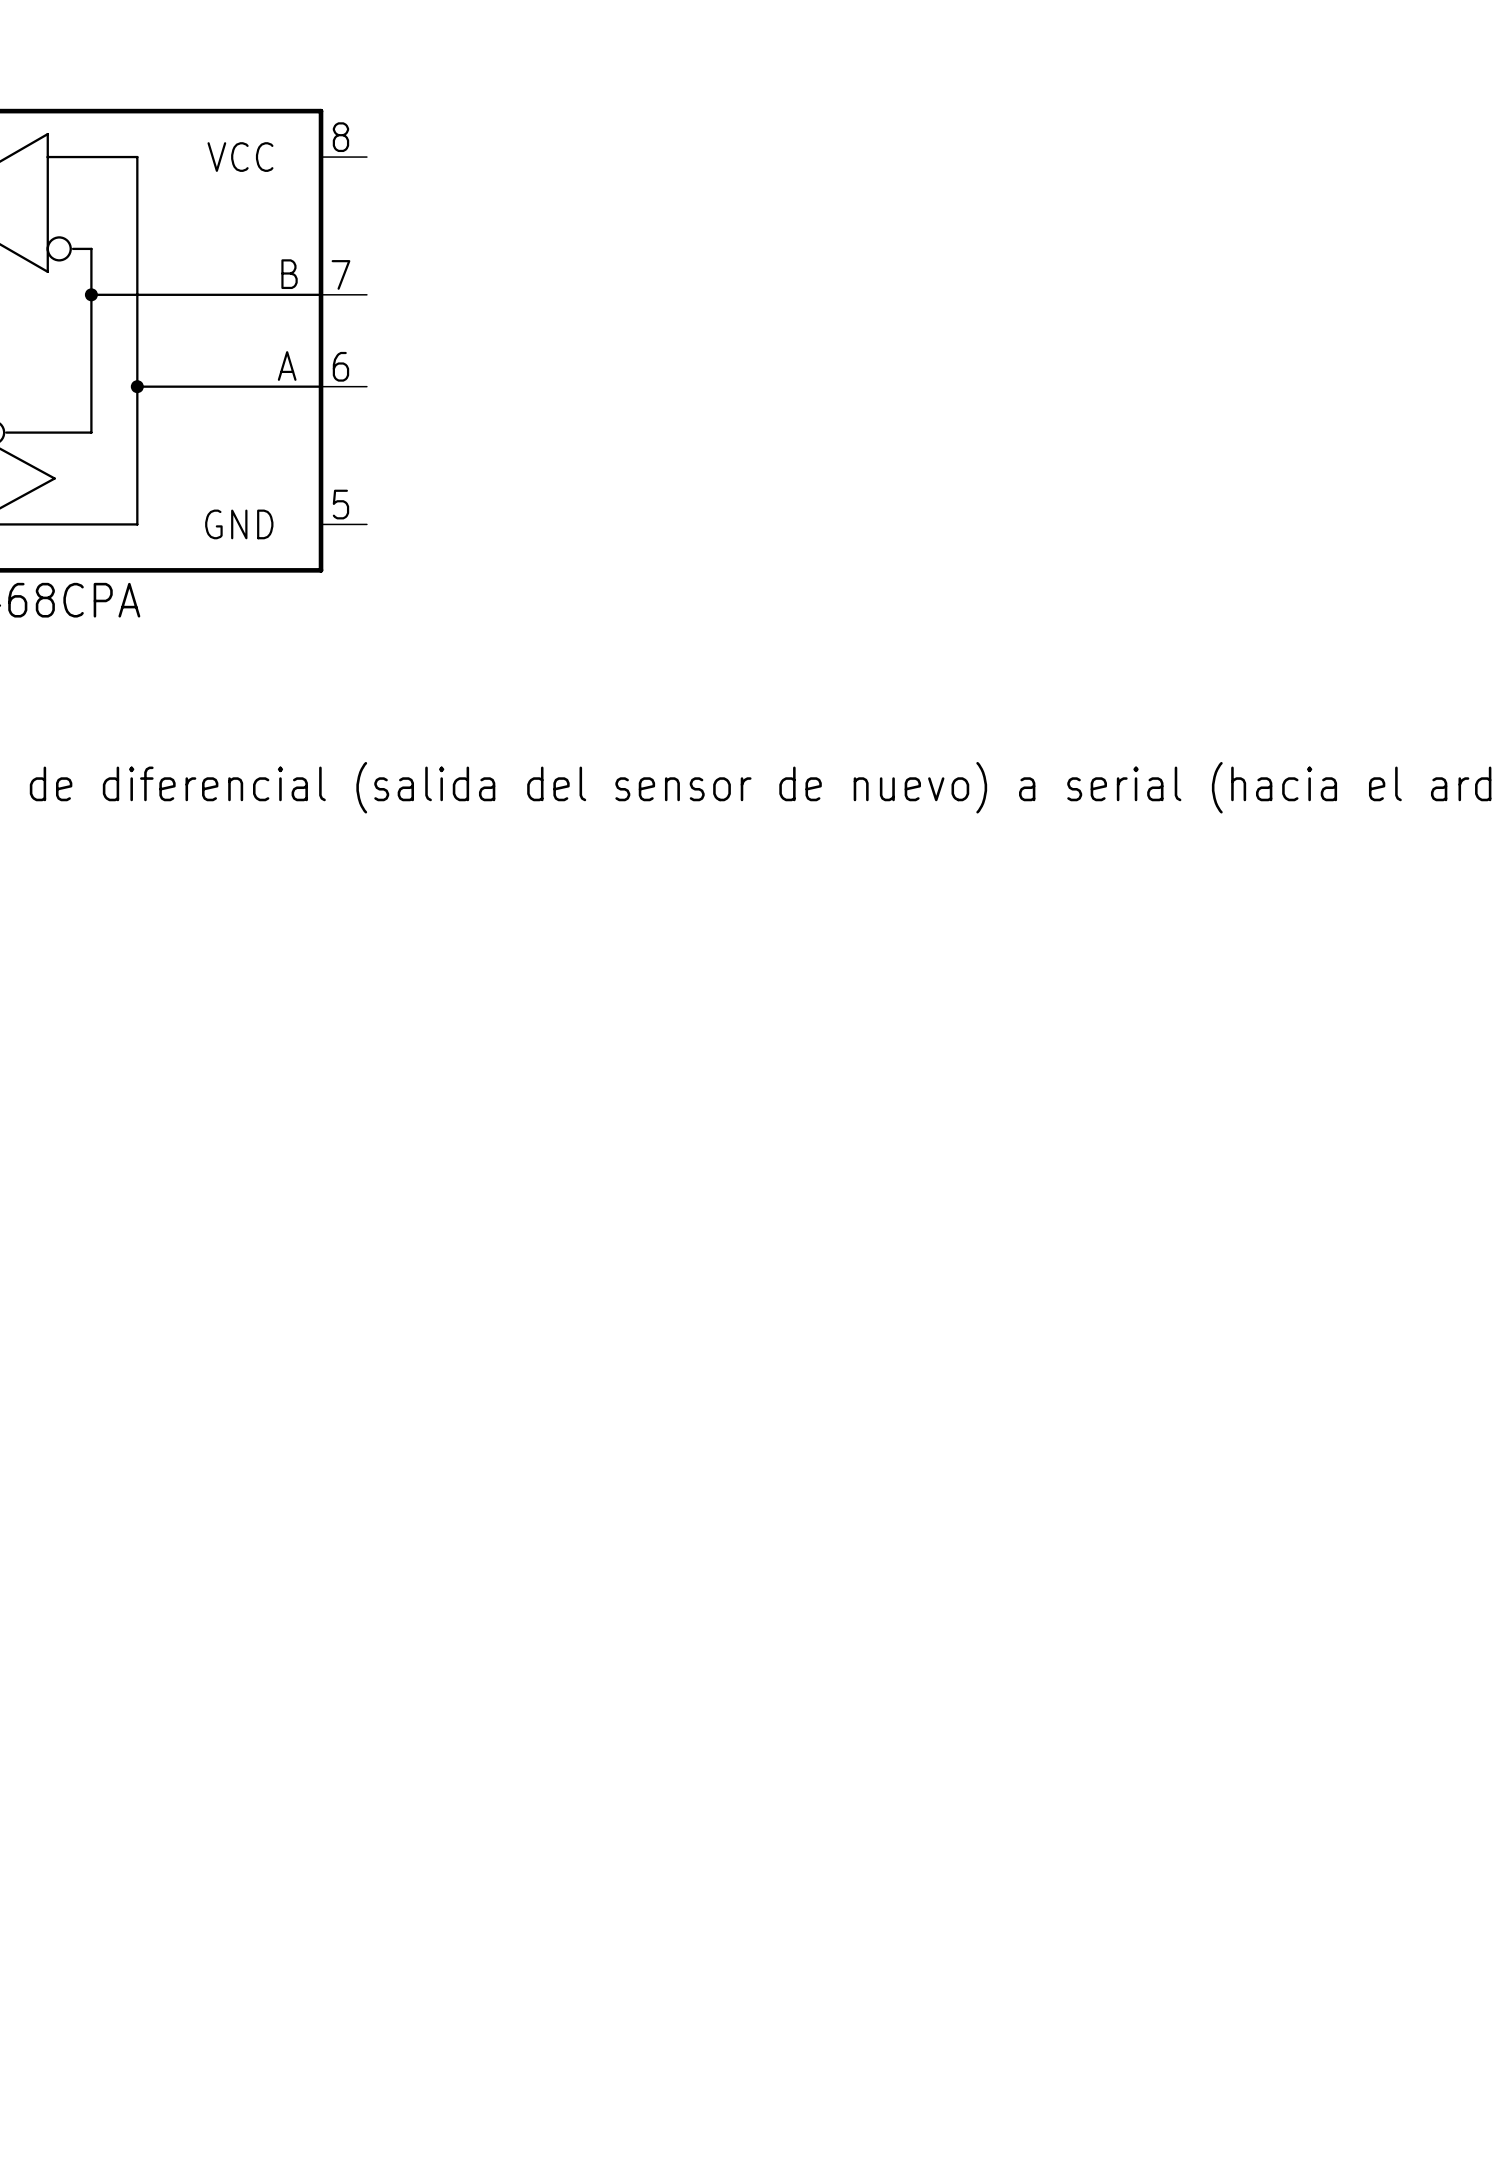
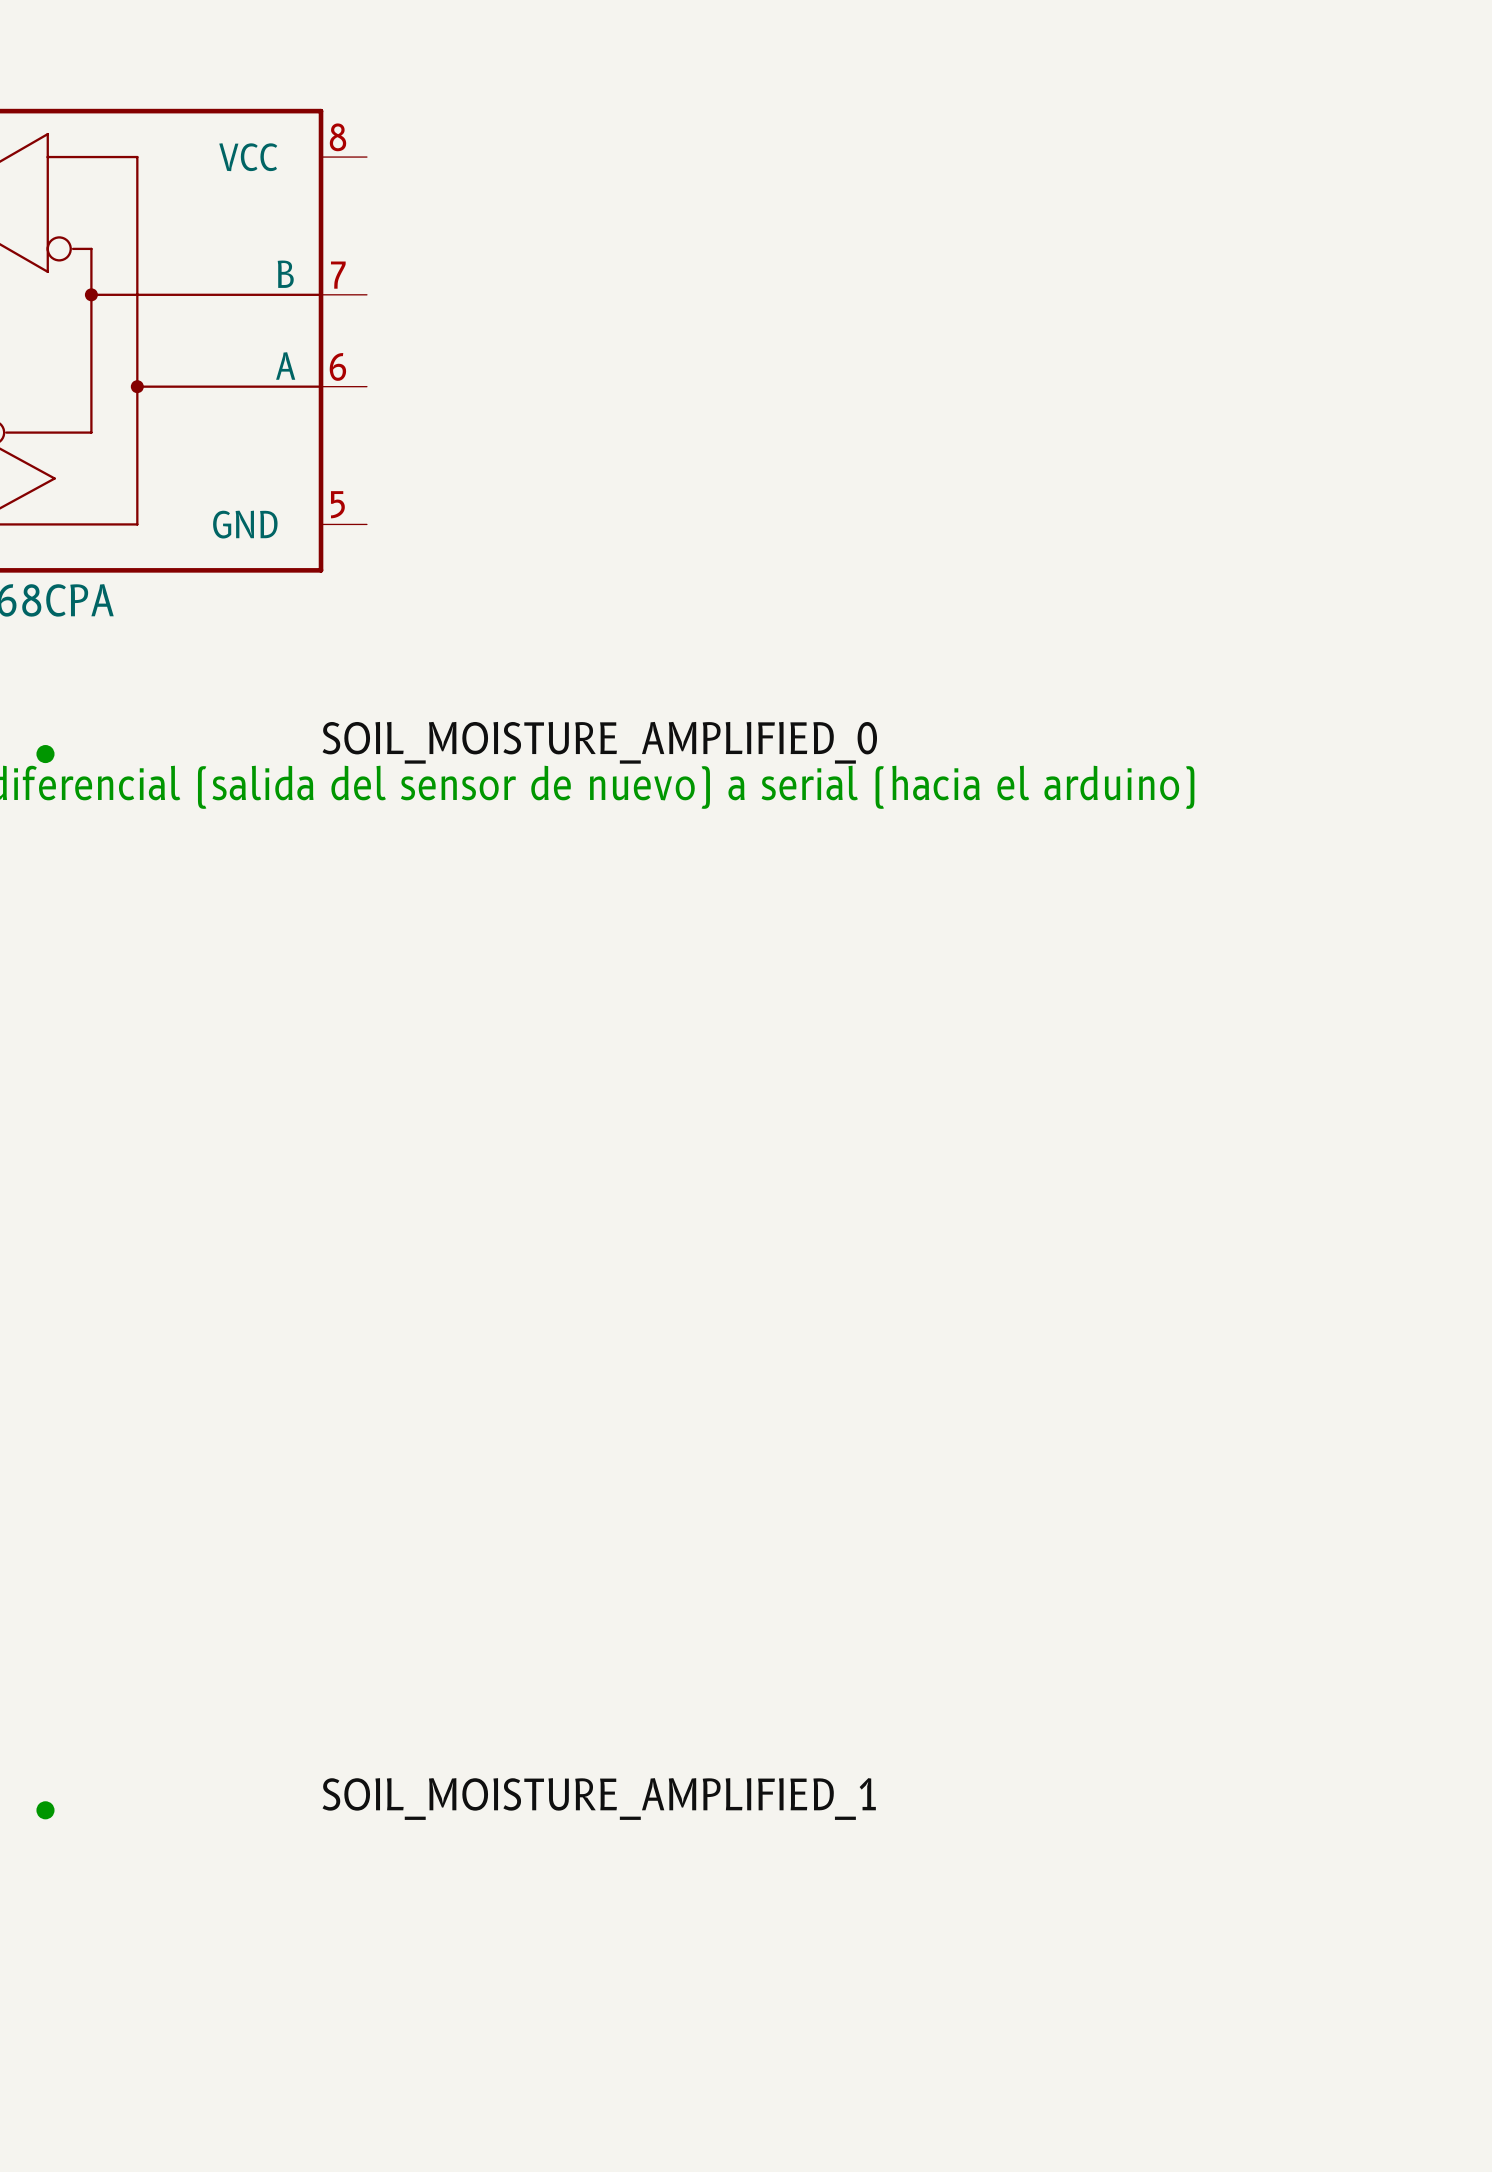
label: none -> SOIL_MOISTURE_AMPLIFIED_0 (599, 742)
junction: none -> (45, 754)
label: none -> SOIL_MOISTURE_AMPLIFIED_1 (599, 1799)
junction: none -> (45, 1810)

